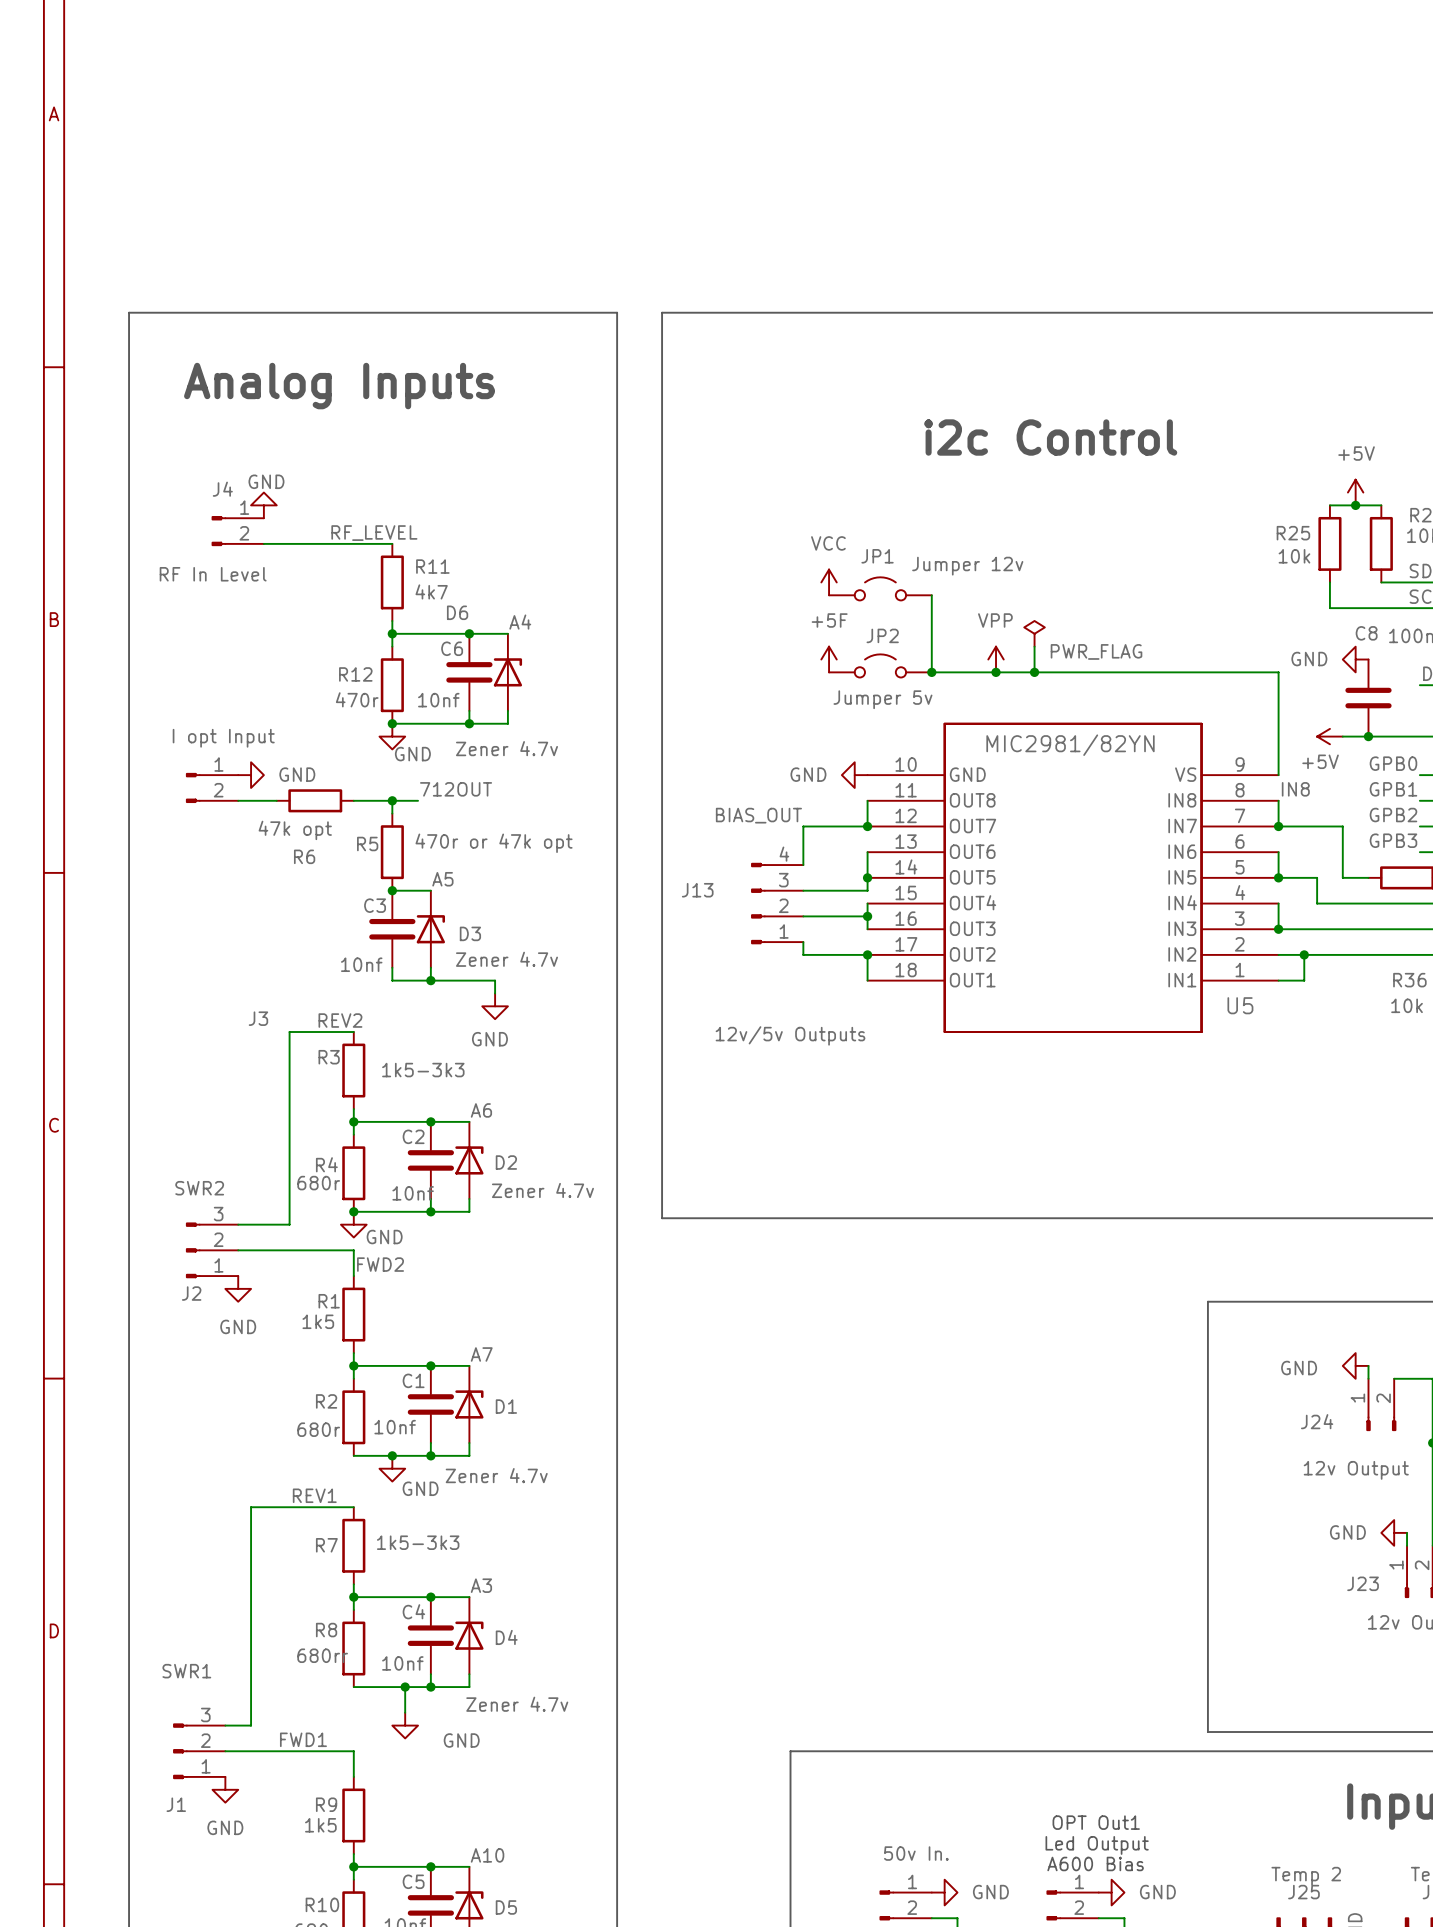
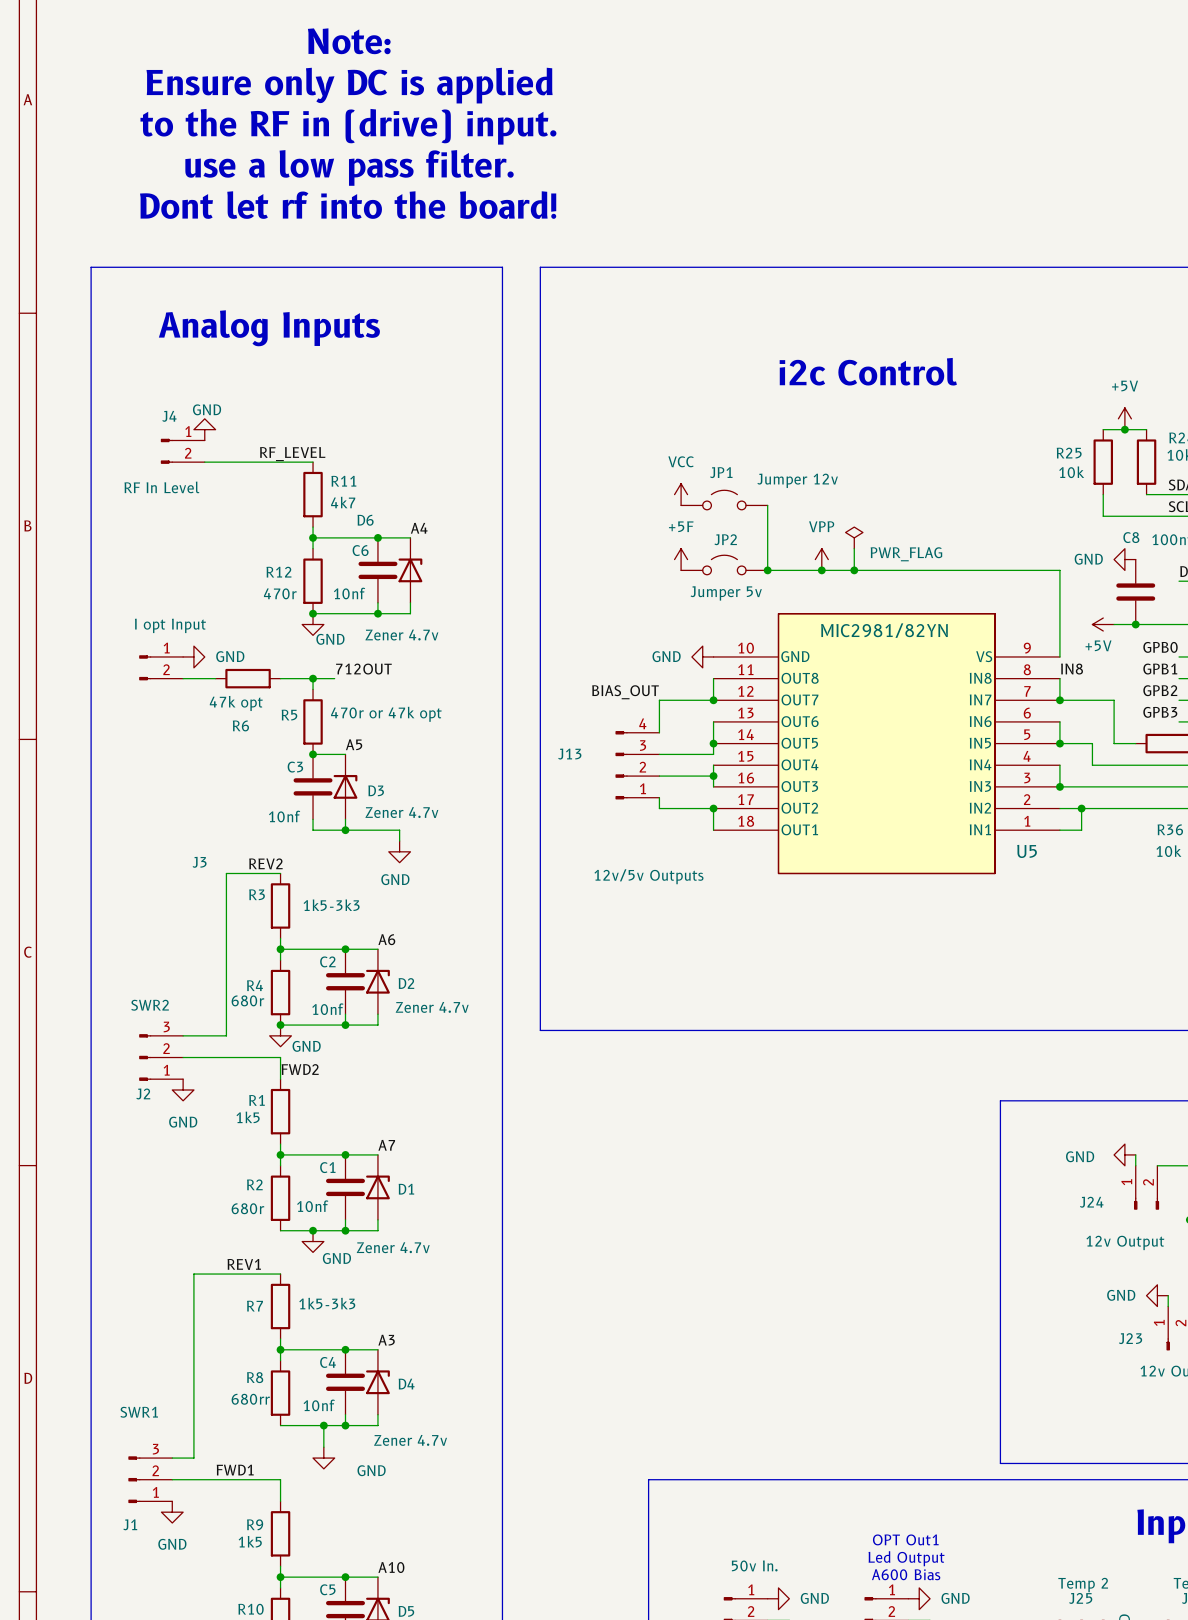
text: none -> Note: (349, 41)
text: none -> Ensure only DC is applied (349, 85)
text: none -> to the RF in (drive) input. (348, 126)
text: none -> use a low pass filter. (349, 167)
text: none -> Dont let rf into the board! (348, 205)

